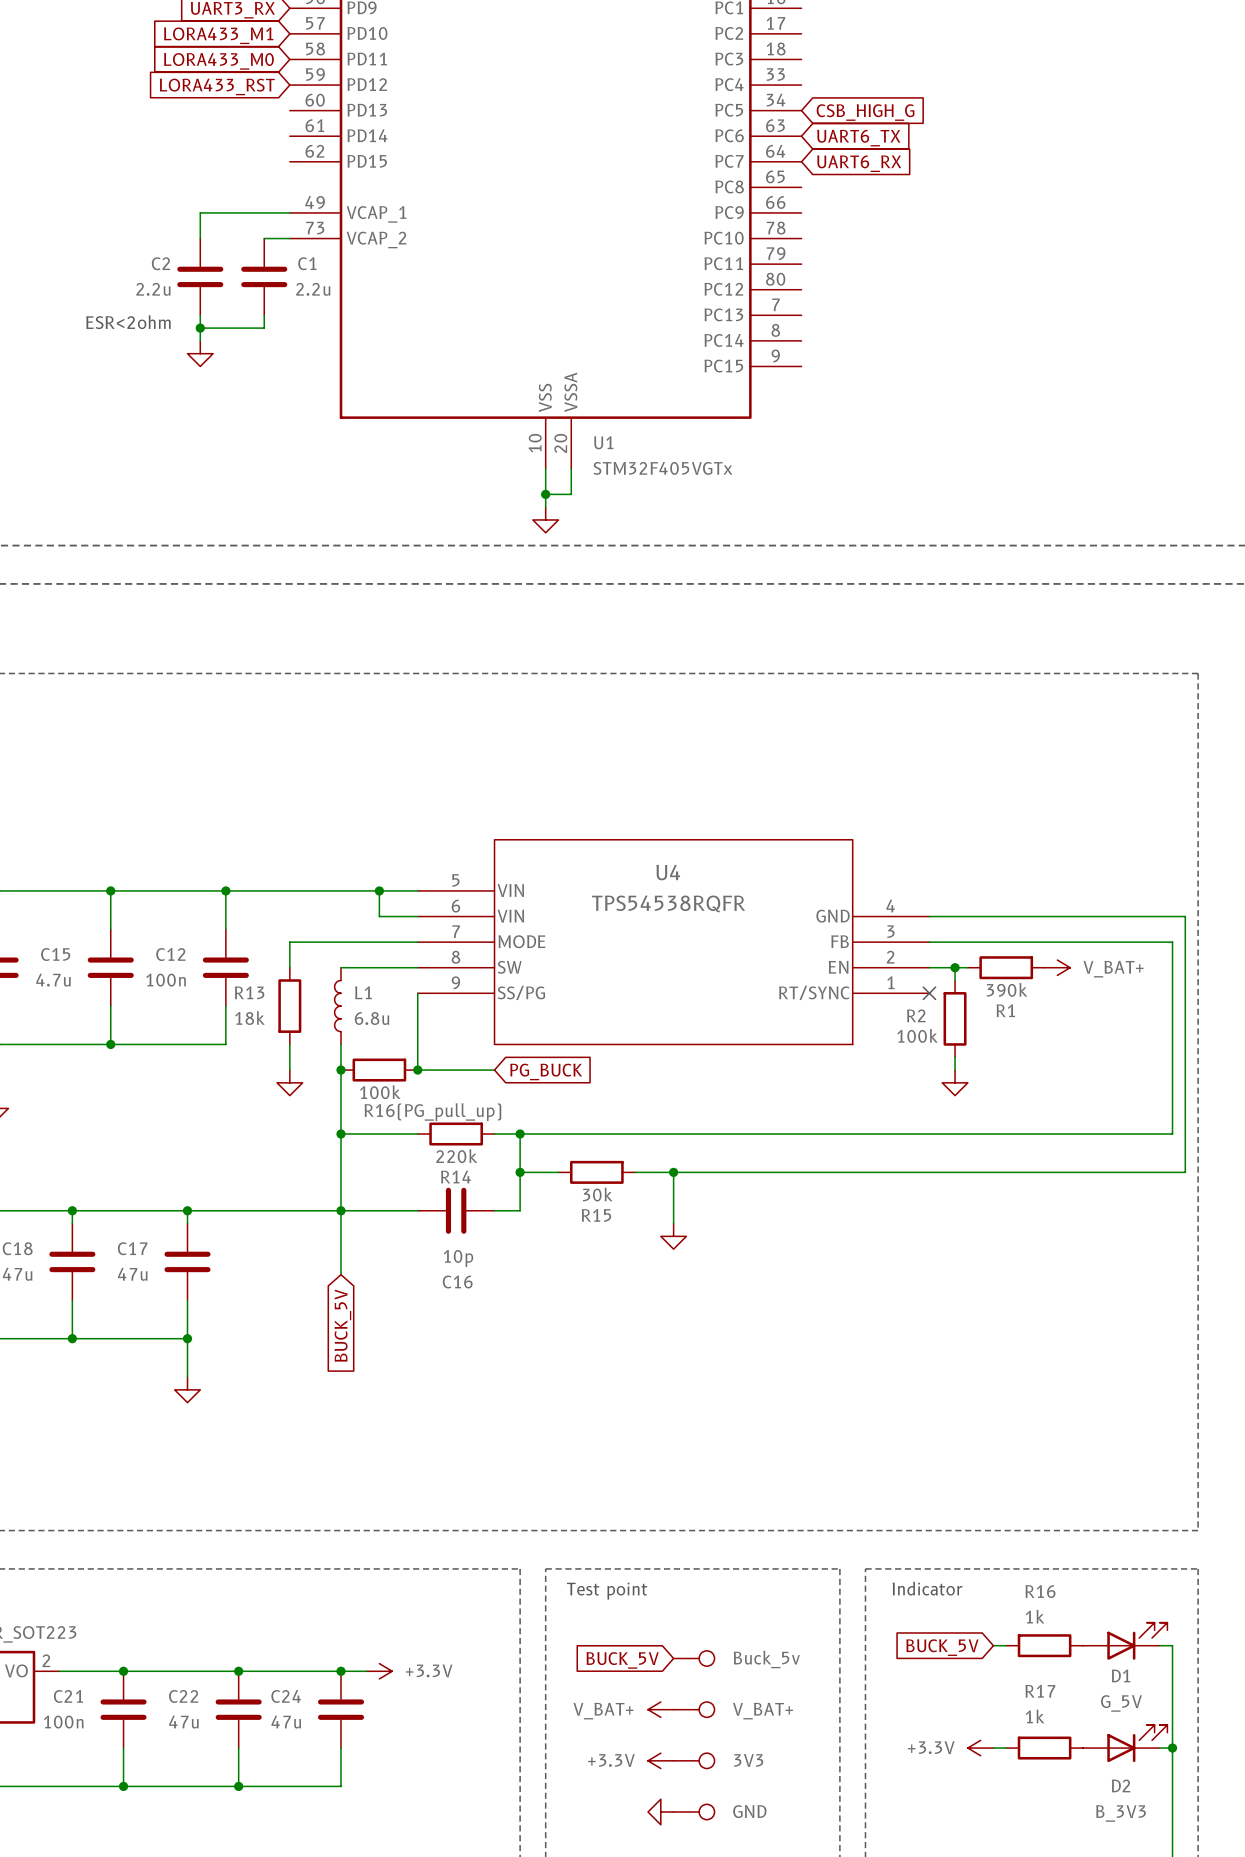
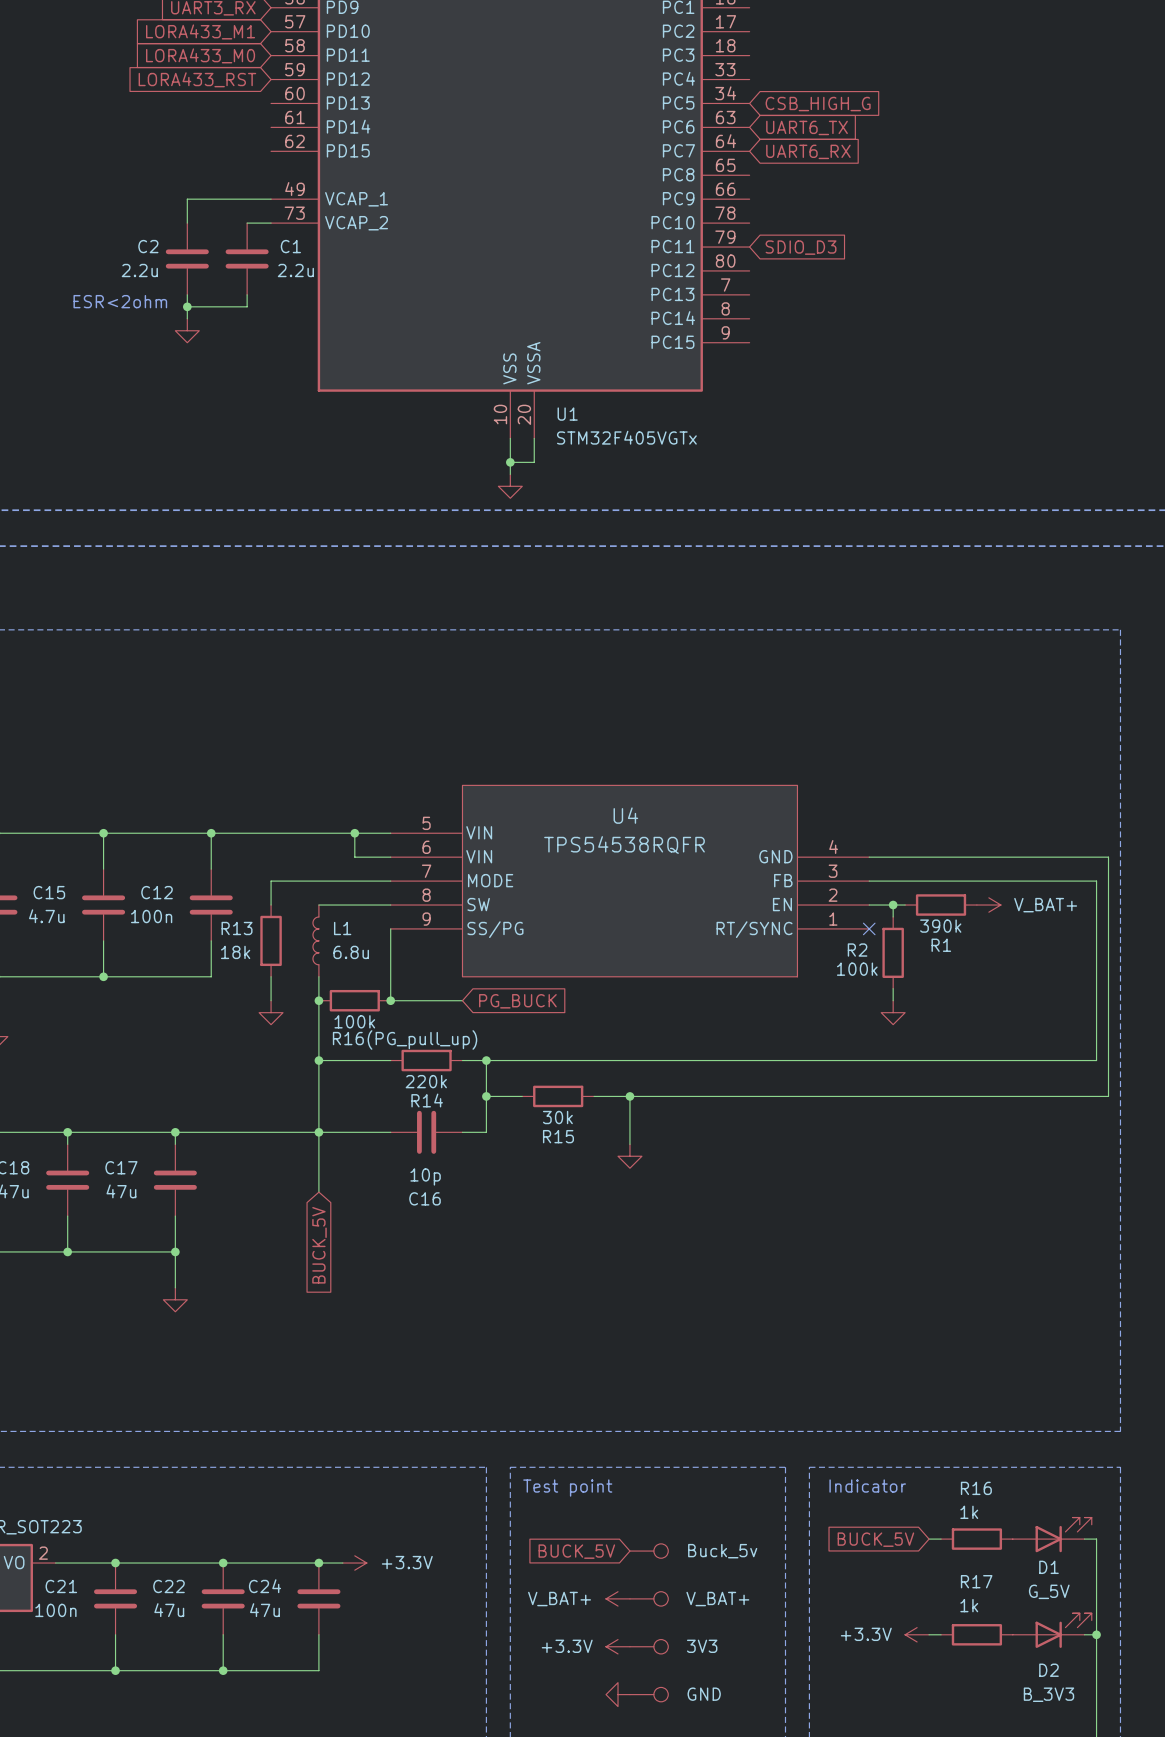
global label: none -> SDIO_D3 (801, 247)

